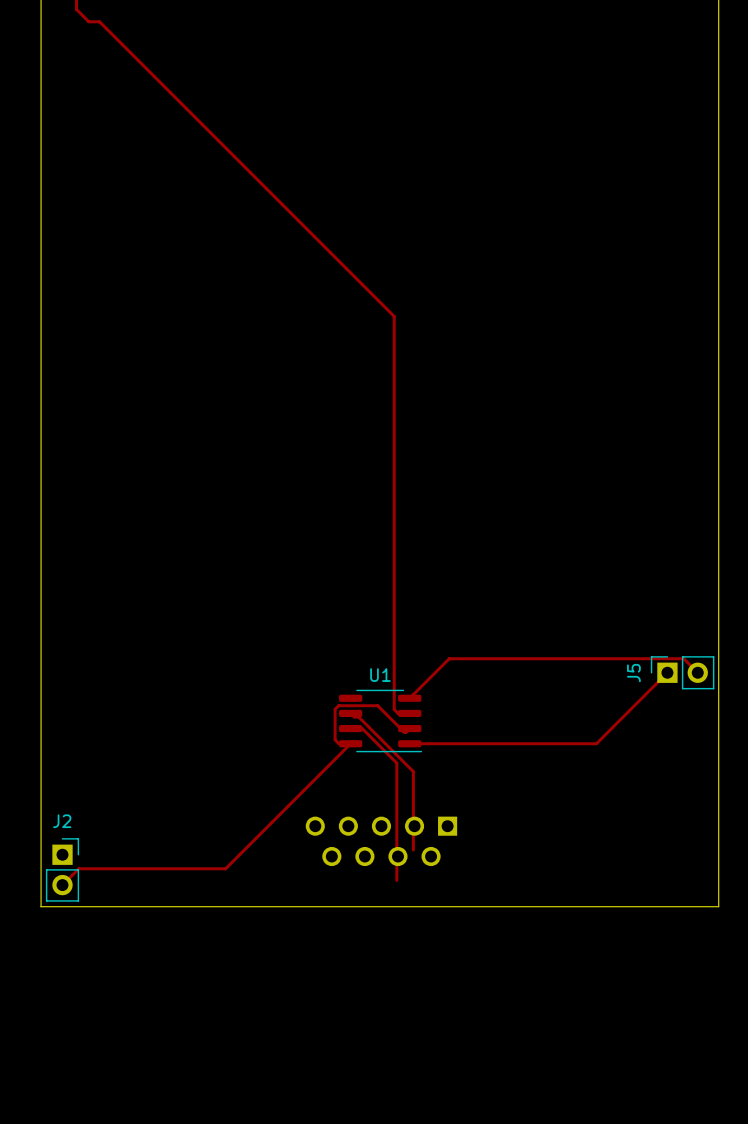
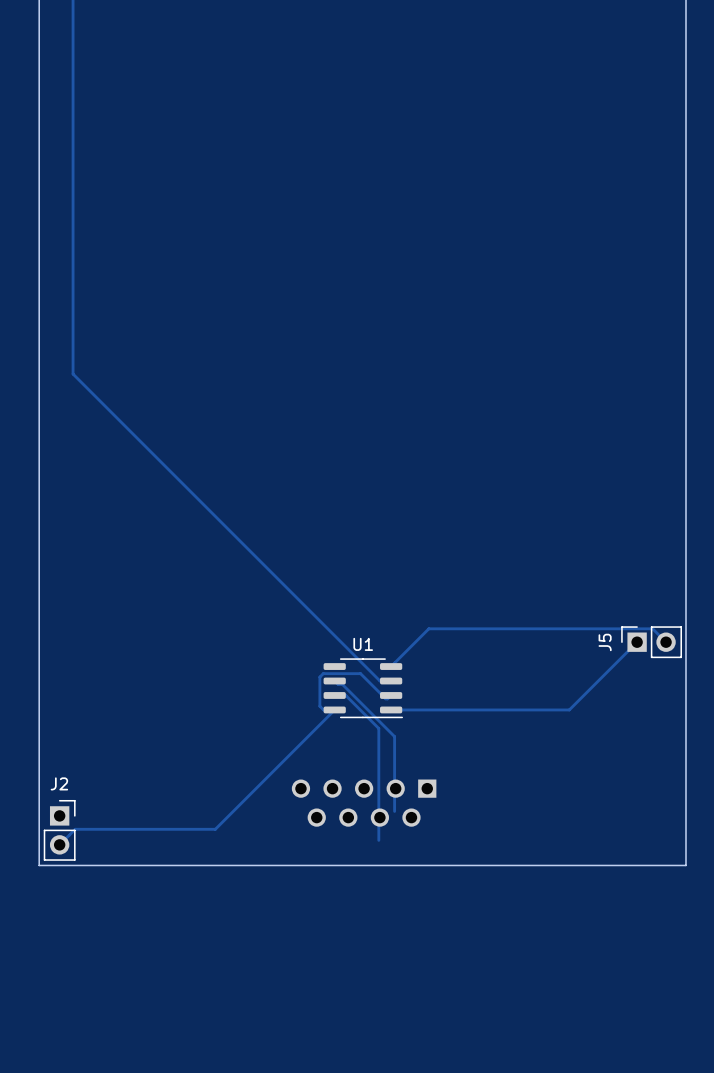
track: (76, 9) (88, 21) (99, 21) (394, 316) (394, 709) -> (73, 9) (73, 374) (376, 677)

